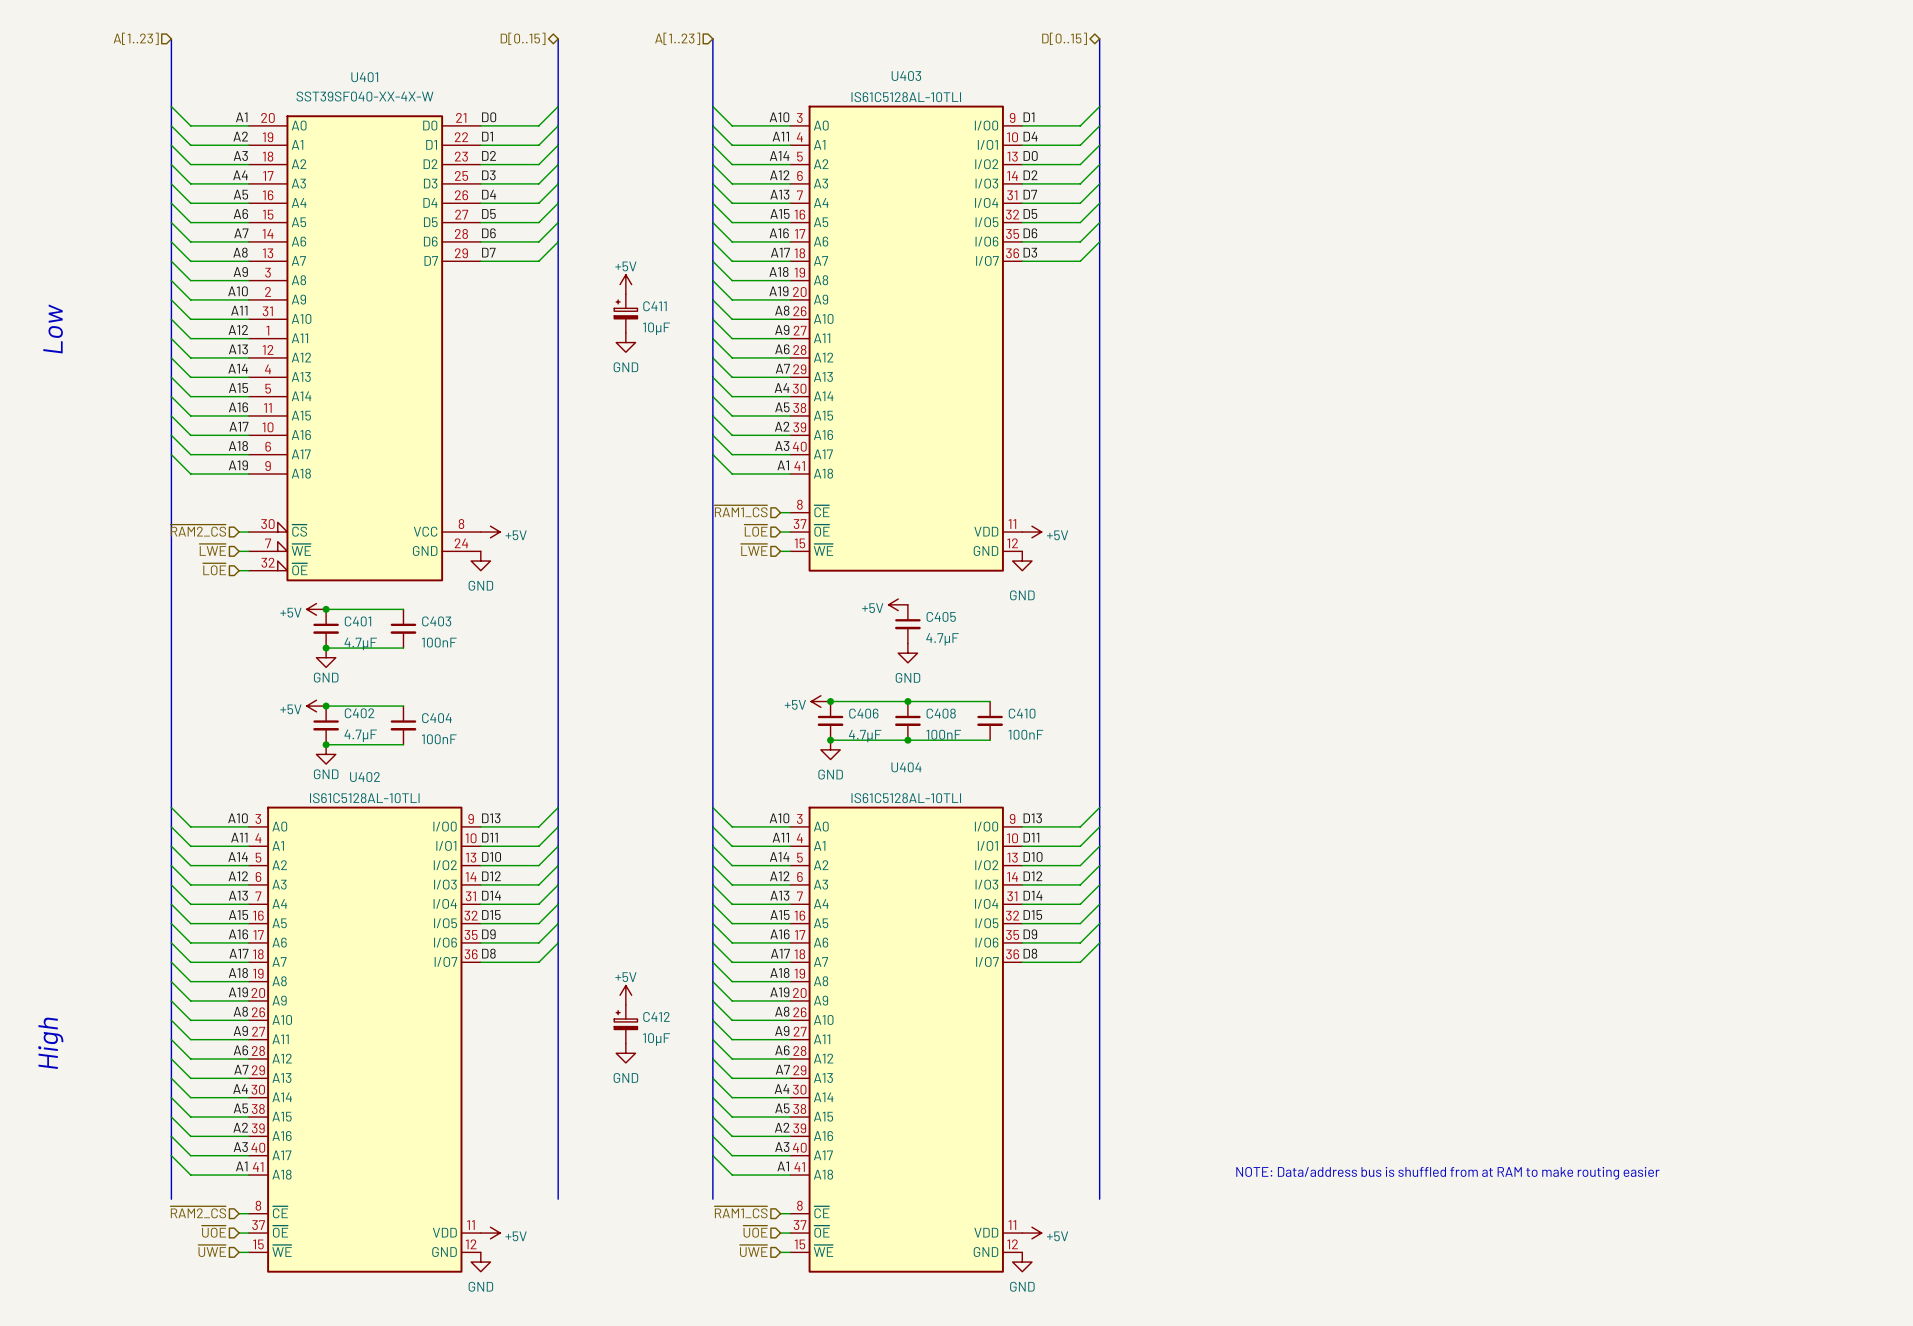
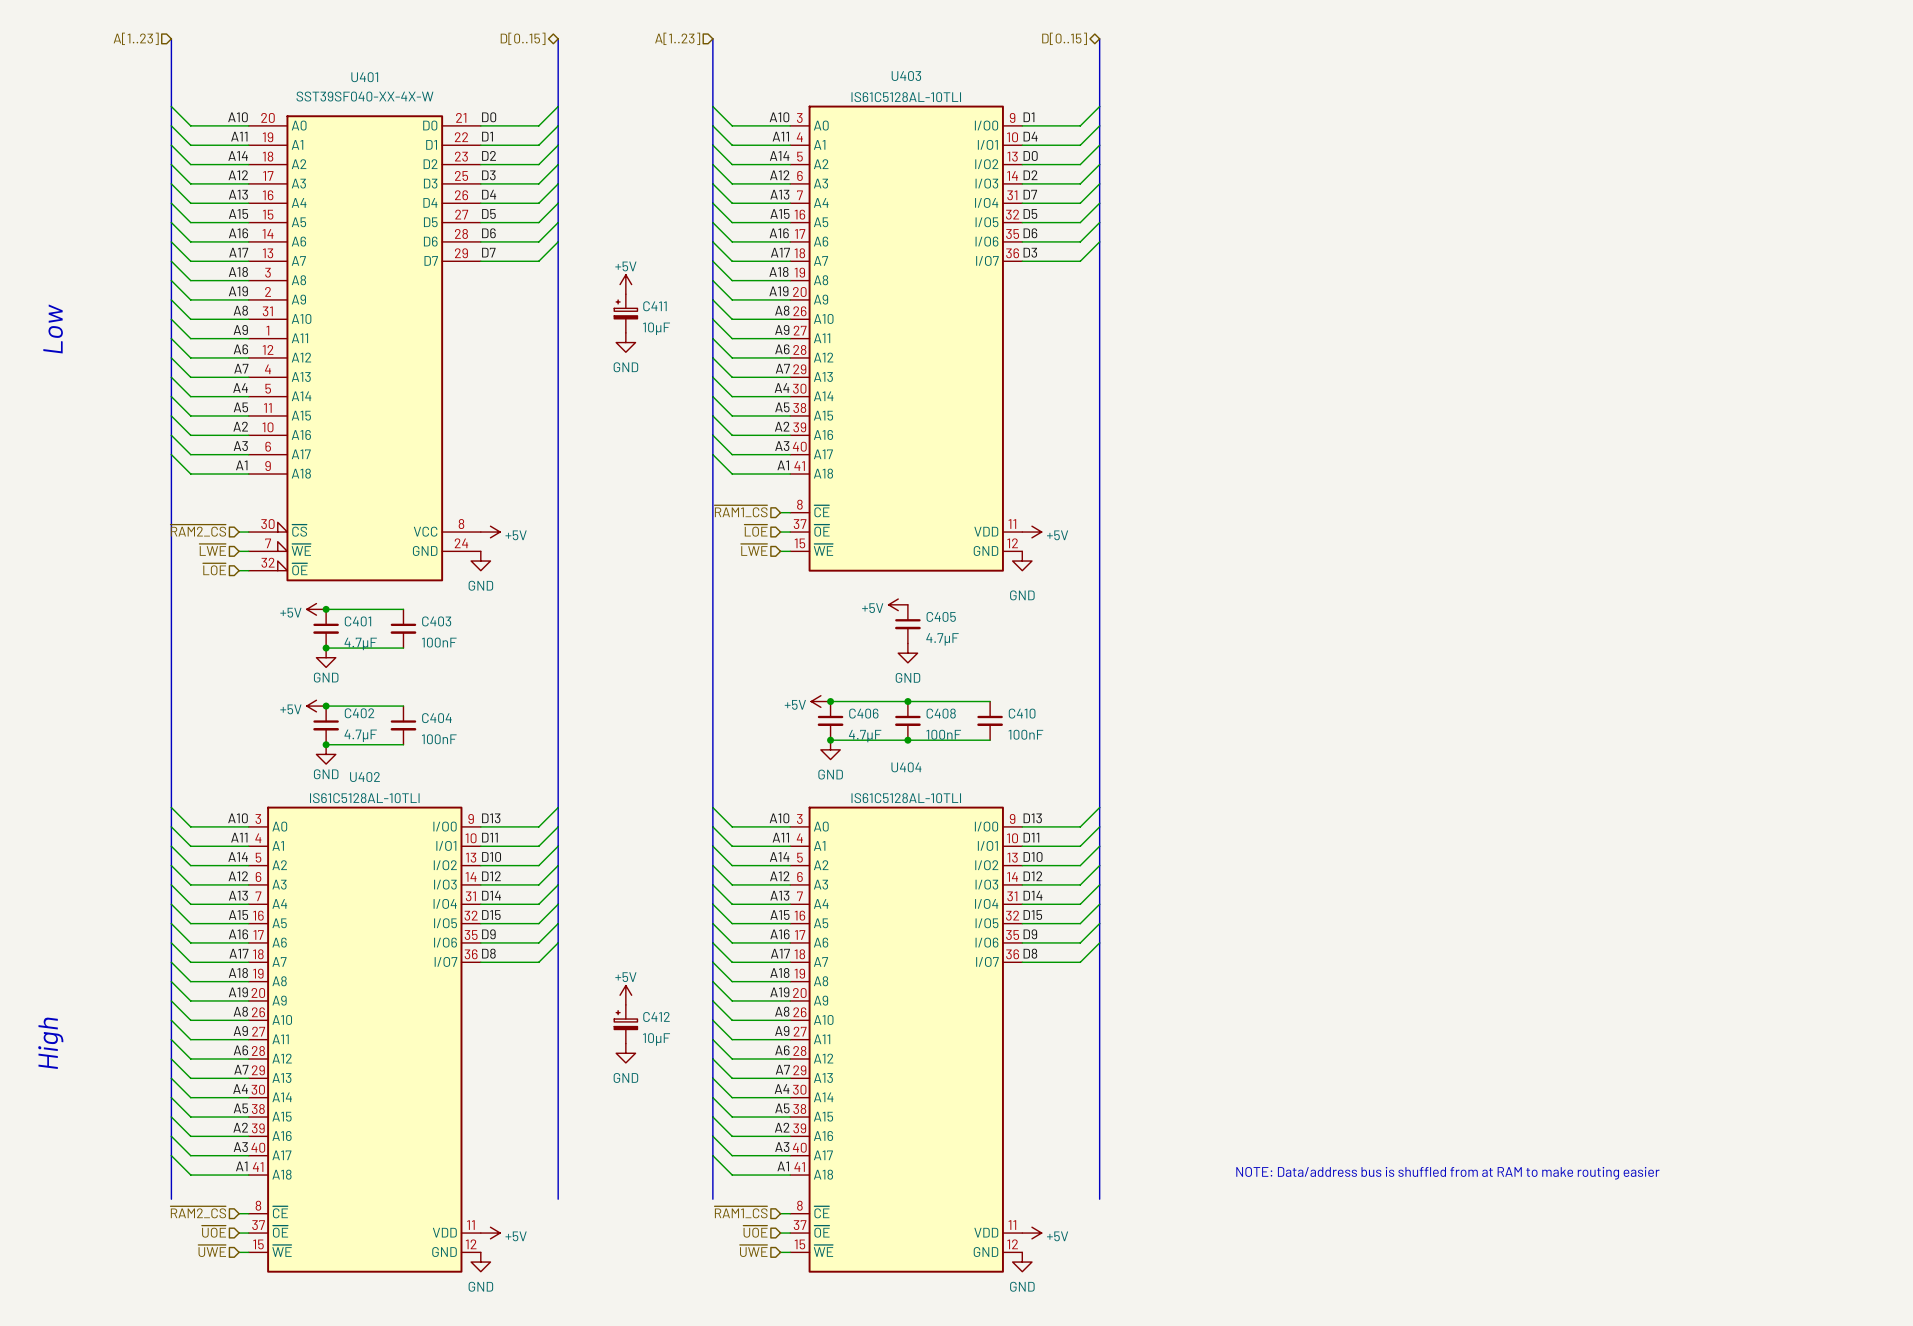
label: A1 (241, 117) -> A10 (237, 117)
label: A2 (240, 136) -> A11 (239, 136)
label: A3 (240, 156) -> A14 (238, 155)
label: A4 (240, 175) -> A12 (238, 175)
label: A5 (240, 194) -> A13 (238, 194)
label: A6 (240, 213) -> A15 (238, 214)
label: A7 (241, 233) -> A16 (238, 233)
label: A8 (240, 252) -> A17 (238, 252)
label: A9 (240, 271) -> A18 (238, 271)
label: A10 (237, 291) -> A19 (238, 291)
label: A11 (239, 310) -> A8 (240, 310)
label: A12 (238, 329) -> A9 (240, 330)
label: A13 (238, 349) -> A6 (240, 349)
label: A14 (238, 368) -> A7 (241, 368)
label: A15 (238, 388) -> A4 (240, 388)
label: A16 (238, 407) -> A5 (240, 407)
label: A17 (238, 426) -> A2 (240, 426)
label: A18 (238, 446) -> A3 (240, 446)
label: A19 (238, 465) -> A1 (241, 465)

